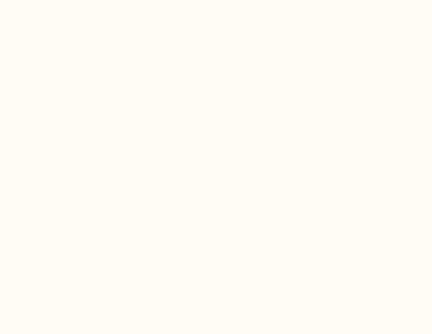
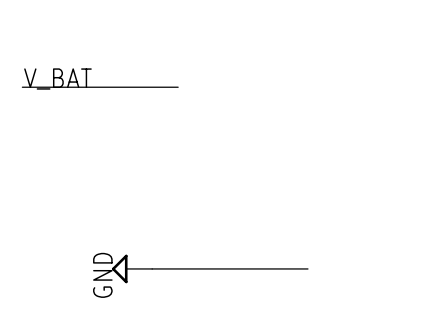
label: none -> V_BAT (57, 79)
wire: none -> (22, 87) (178, 87)
power symbol: none -> GND (132, 268)
wire: none -> (152, 268) (307, 268)

